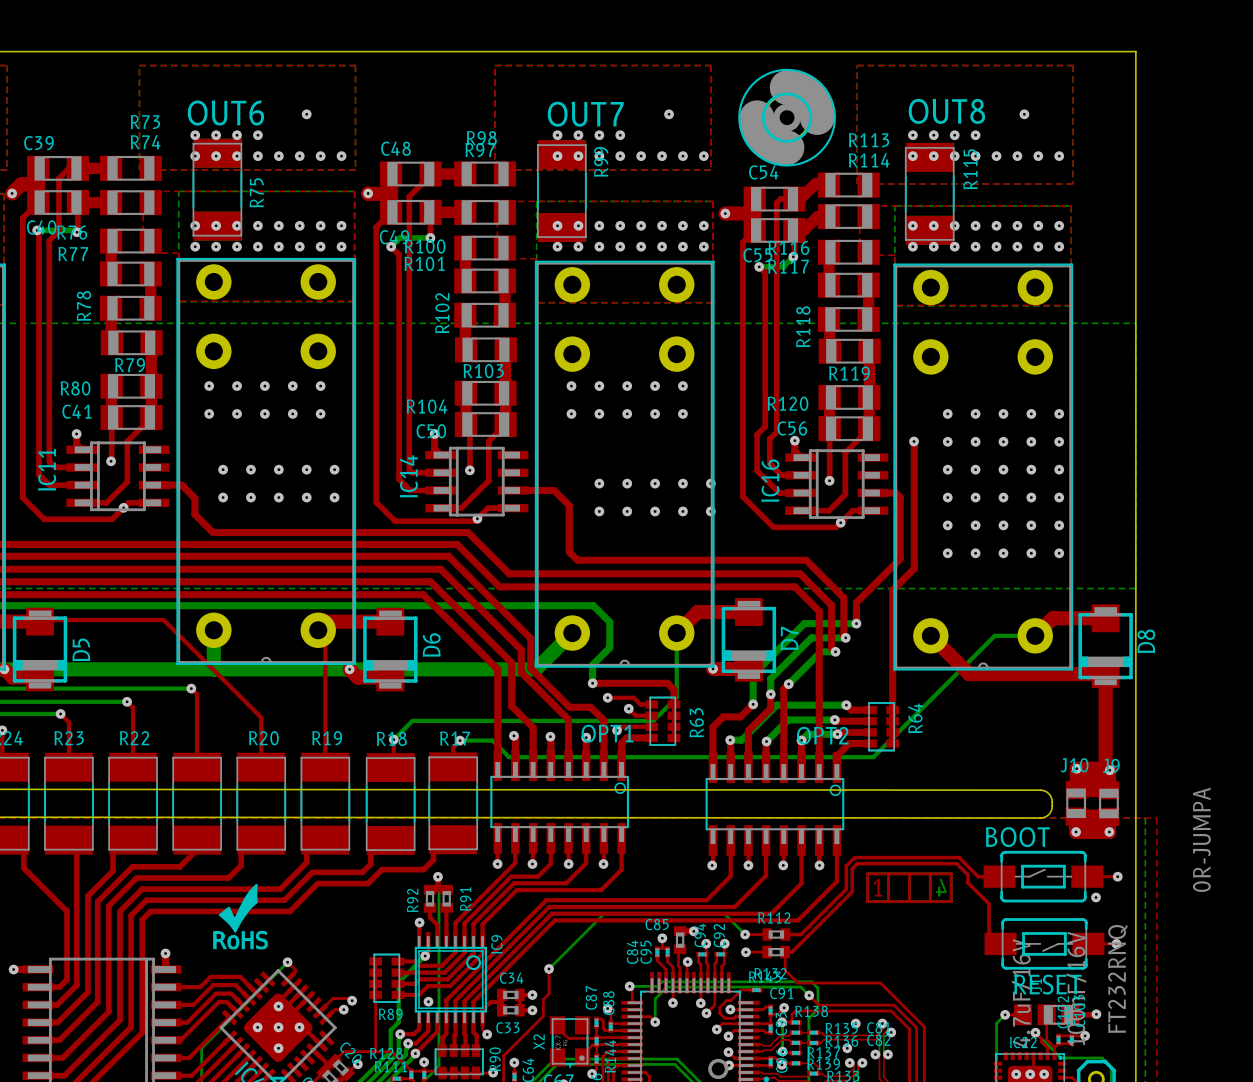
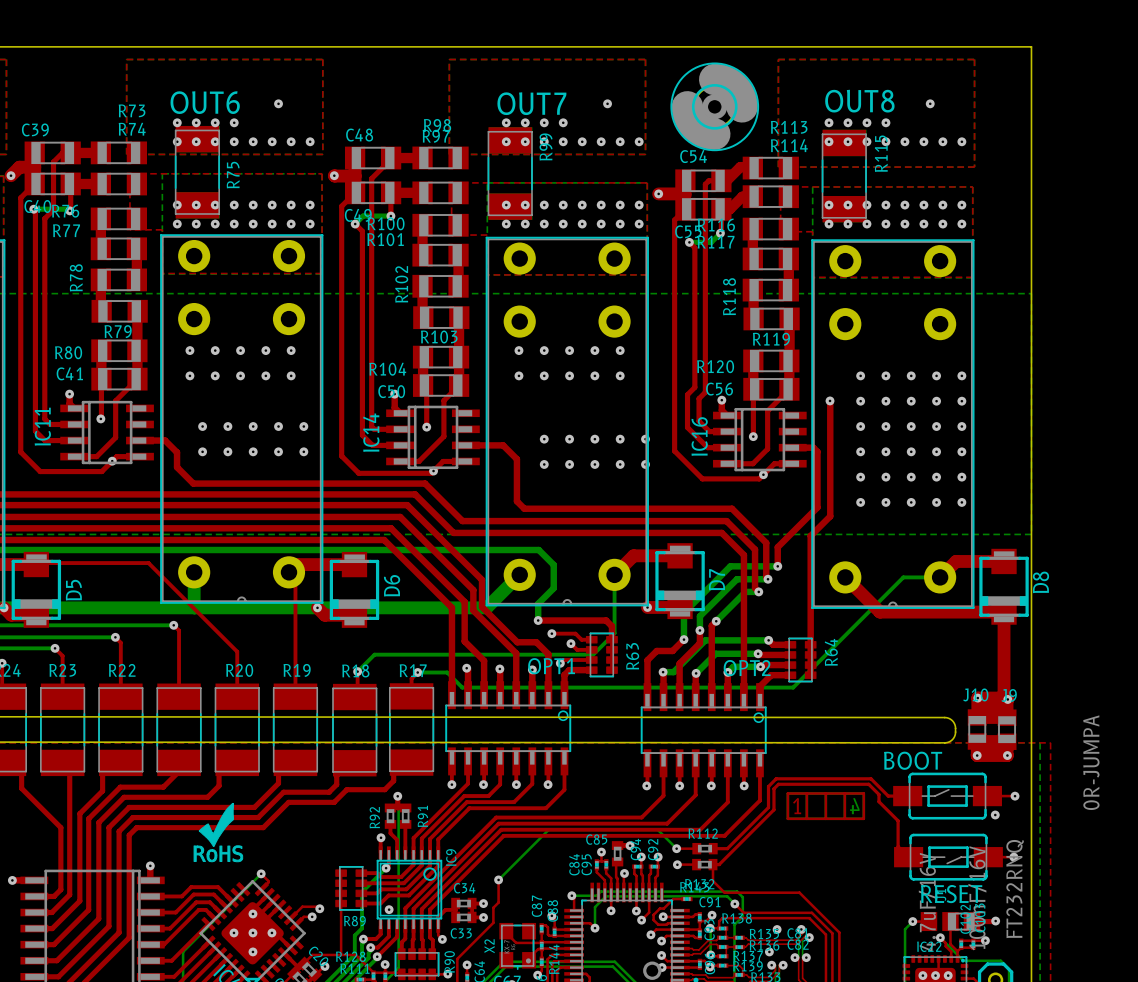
BOOT name position: BOOT (1017, 837) -> BOOT (913, 760)

